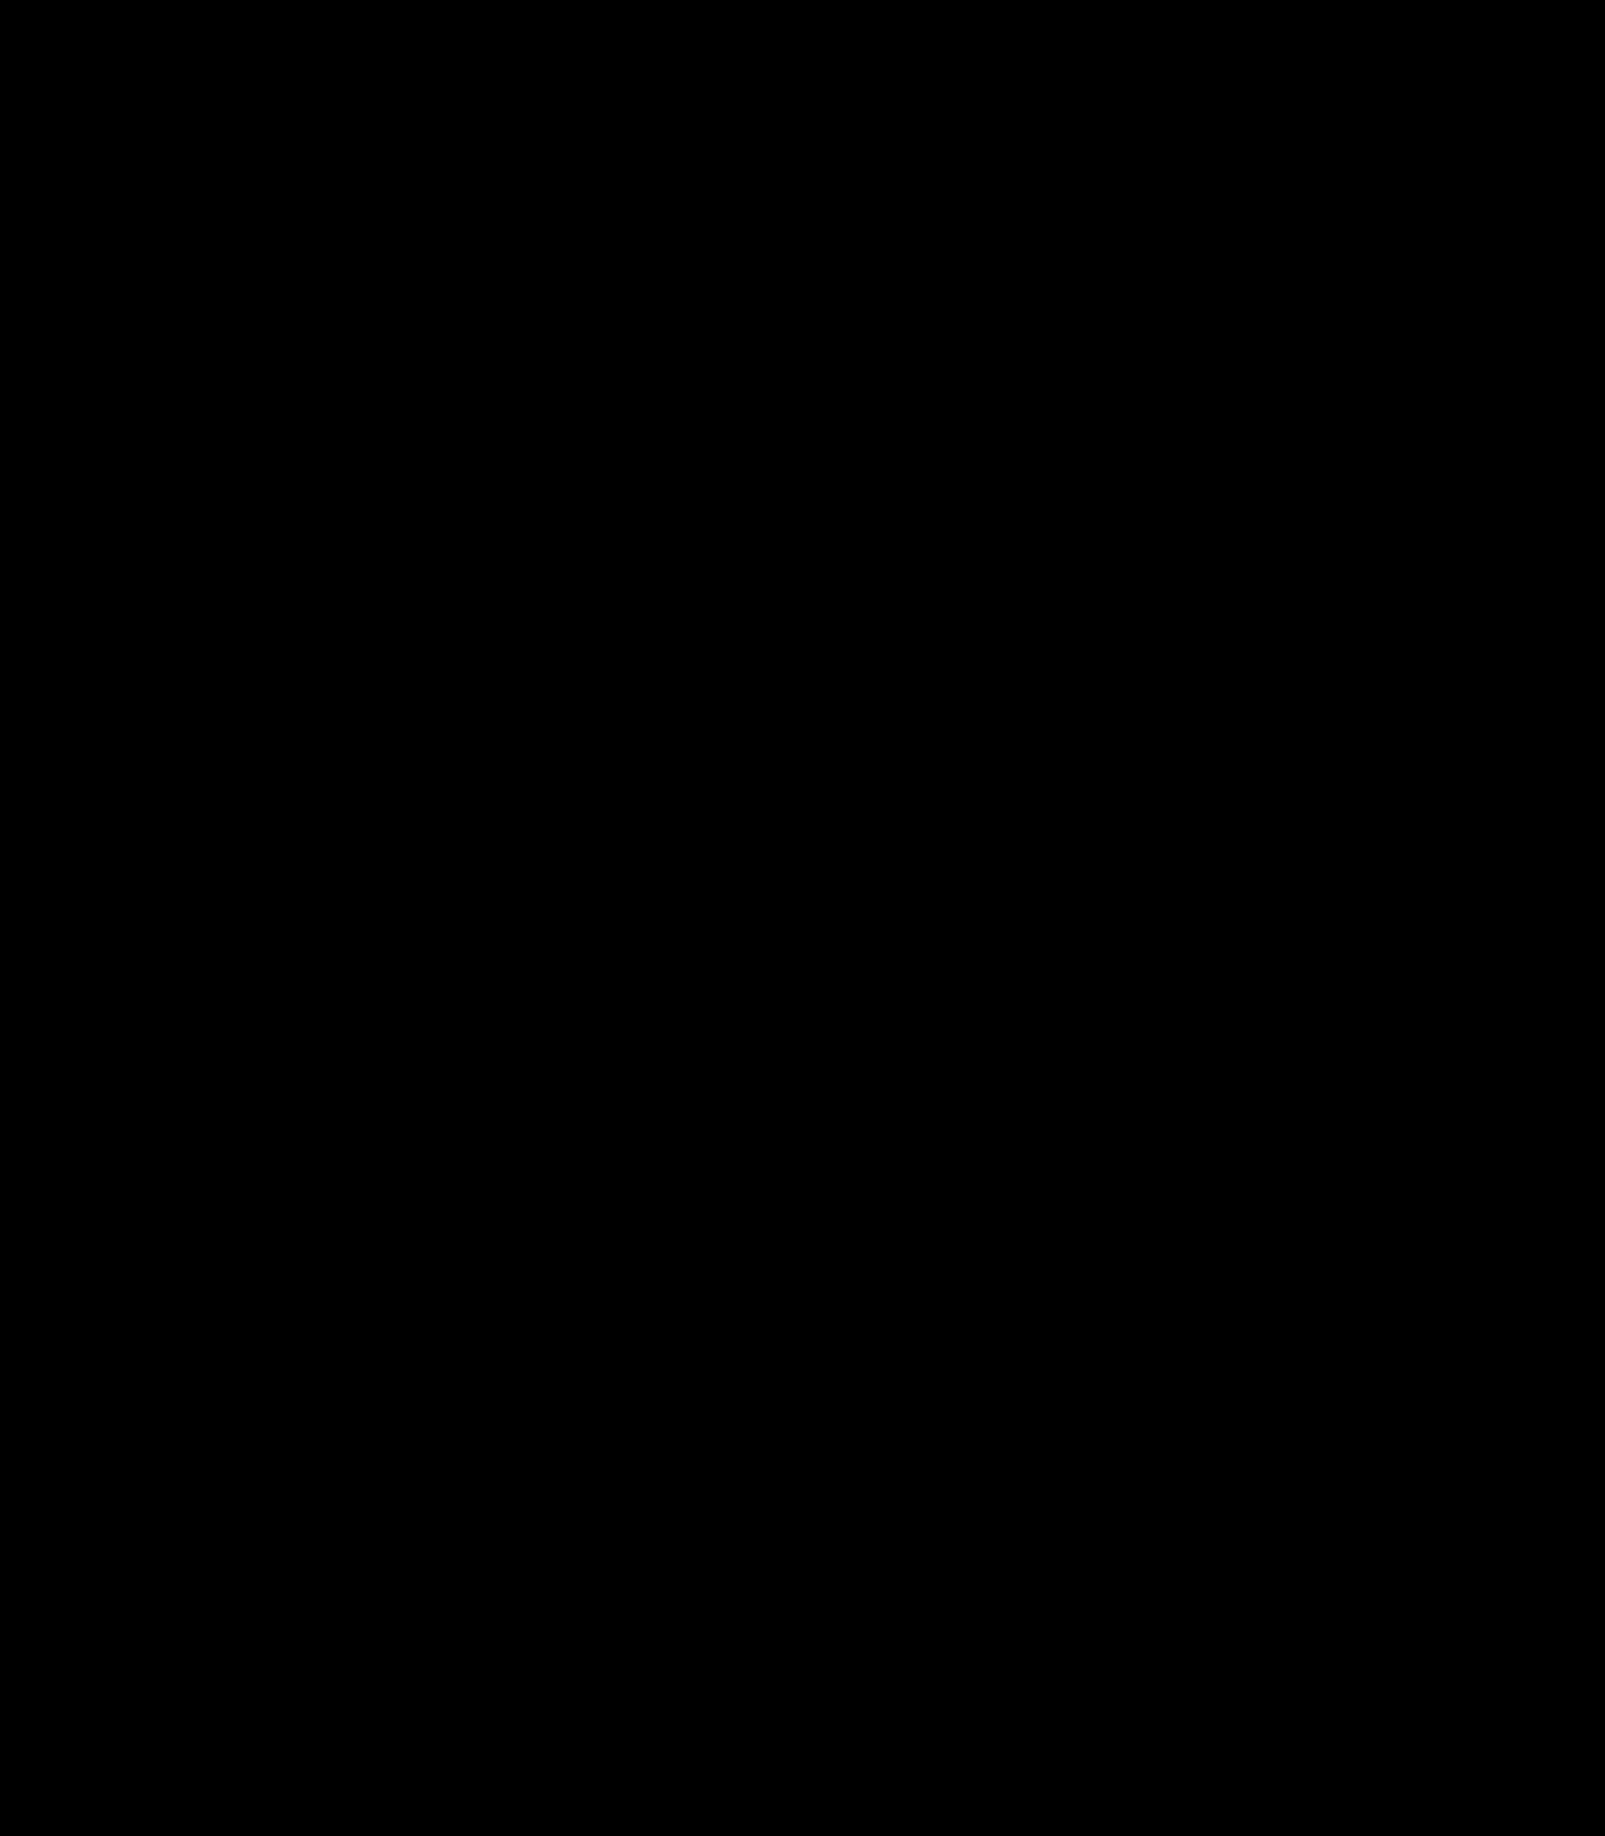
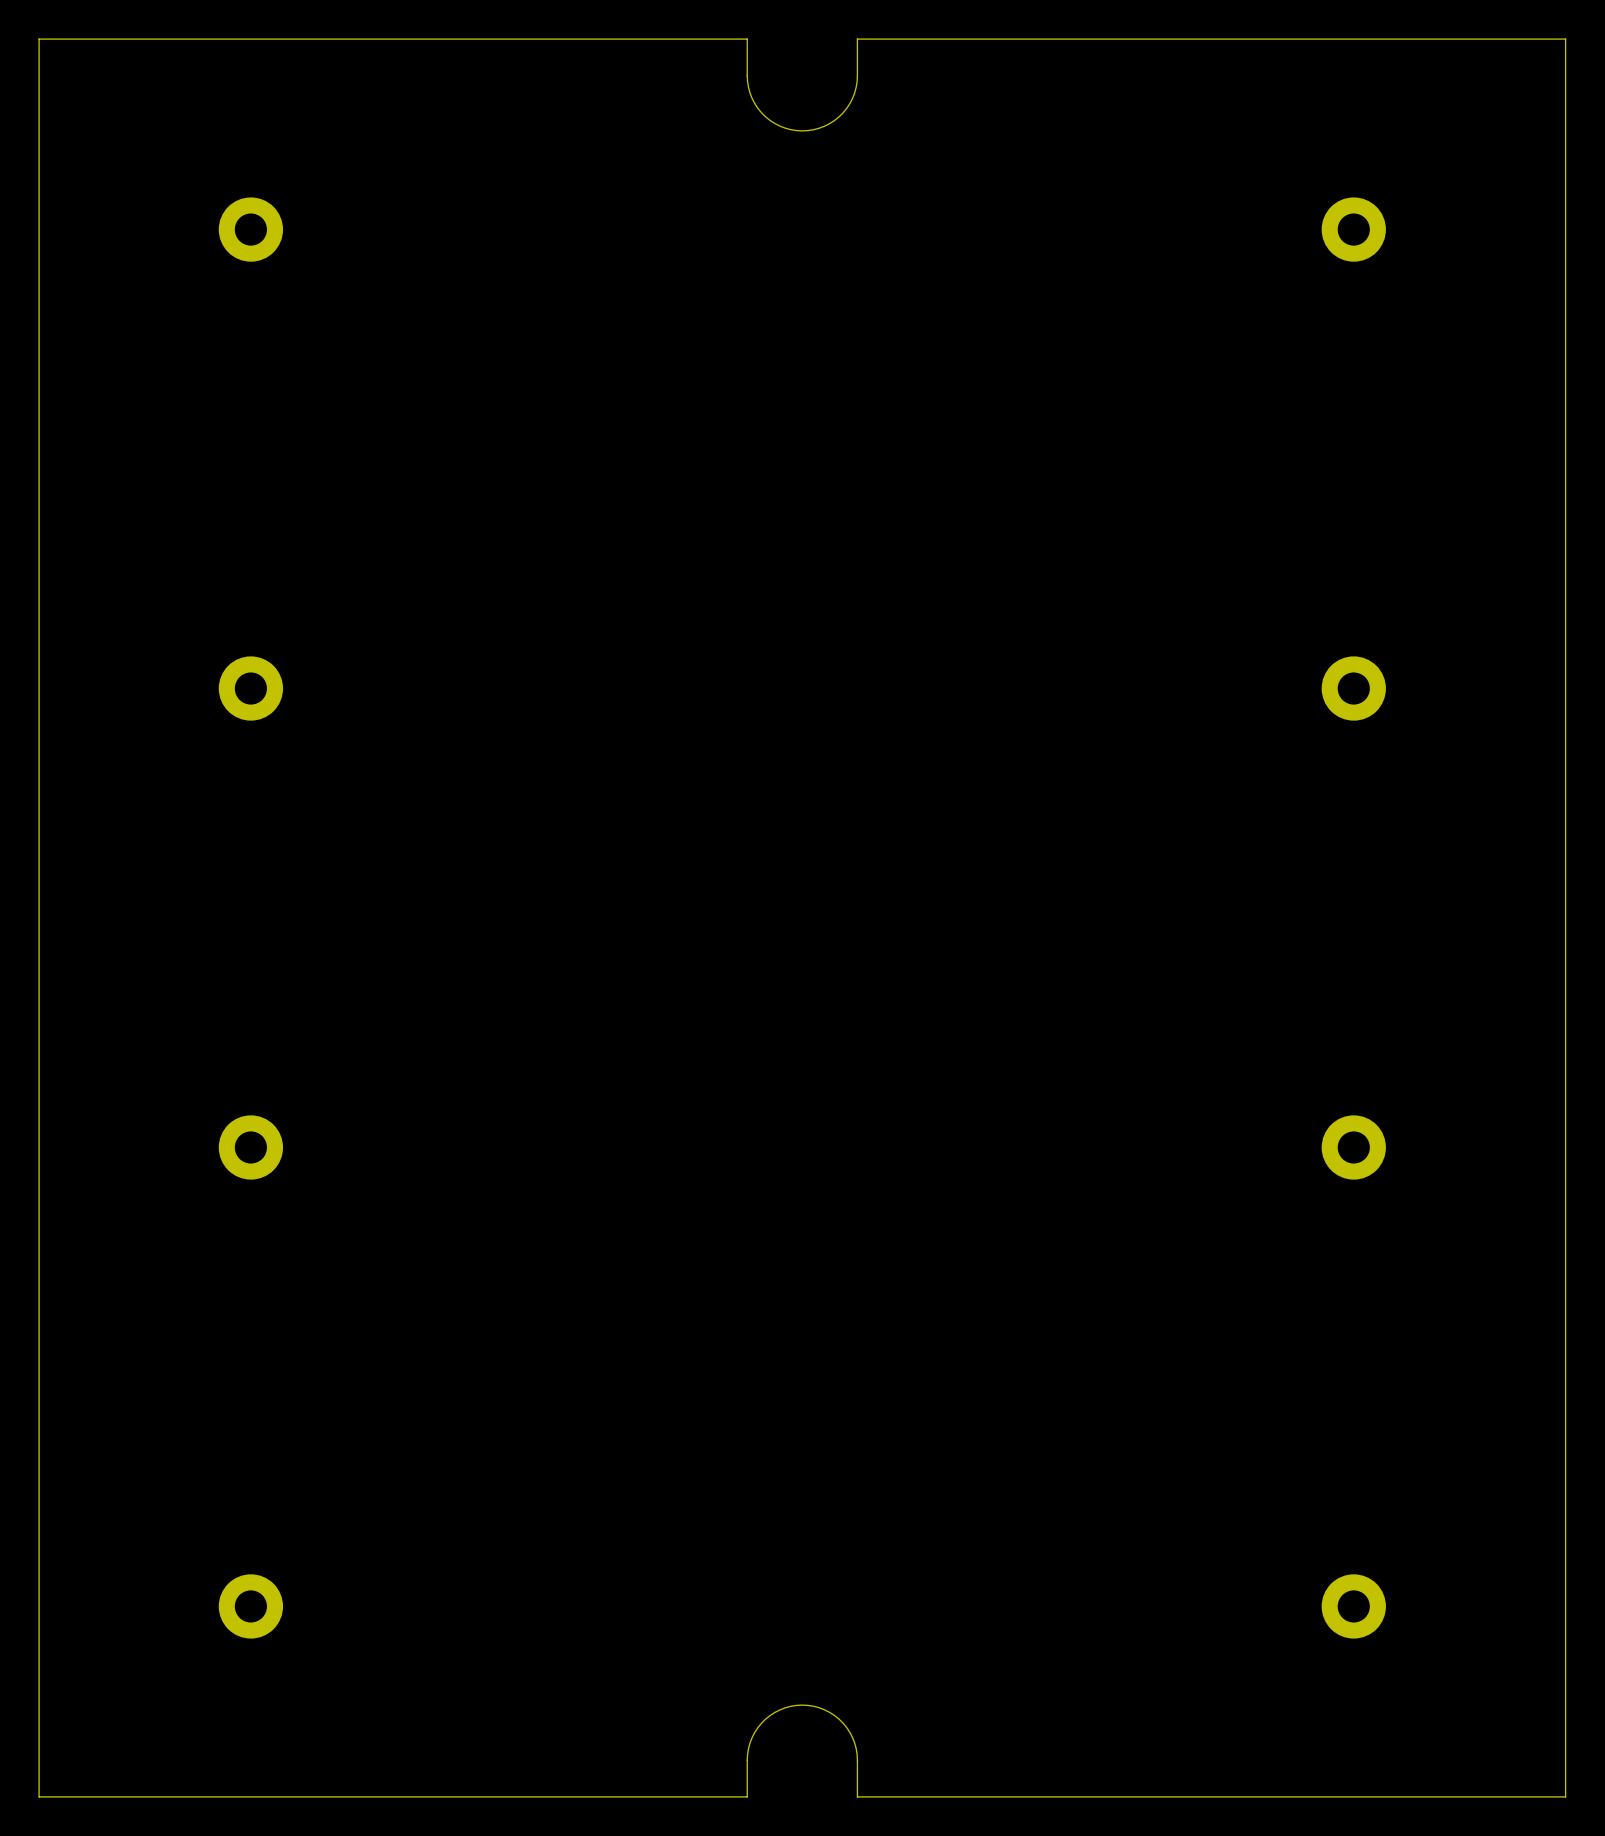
board edge: none -> (39, 39) (747, 39) (747, 81) (754, 103) (761, 112) (774, 123) (785, 128) (802, 130) (819, 128) (829, 123) (843, 112) (850, 103) (857, 81) (857, 39) (1565, 39) (1565, 1796) (857, 1796) (857, 1754) (850, 1732) (839, 1719) (829, 1712) (819, 1707) (802, 1705) (785, 1707) (774, 1712) (765, 1719) (754, 1732) (747, 1754) (747, 1796) (39, 1796) (39, 39)
part: none -> (250, 229)
part: none -> (1353, 229)
part: none -> (250, 688)
part: none -> (1353, 688)
part: none -> (250, 1147)
part: none -> (1353, 1147)
part: none -> (250, 1606)
part: none -> (1353, 1606)

